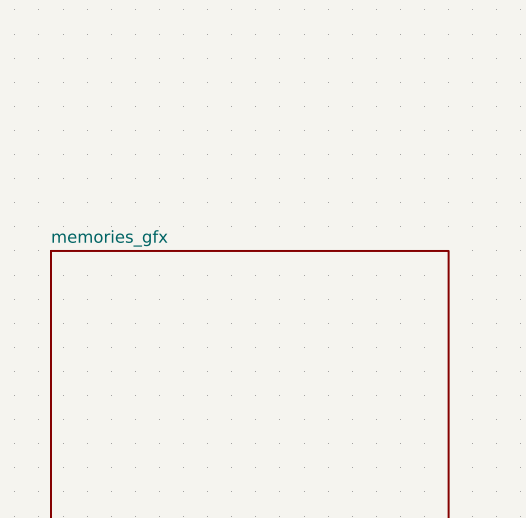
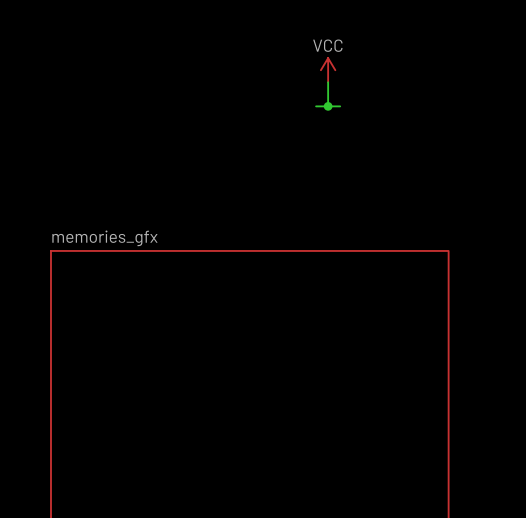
power symbol: none -> VCC (328, 70)
wire: none -> (328, 82) (328, 106)
wire: none -> (316, 106) (340, 106)
junction: none -> (328, 106)

